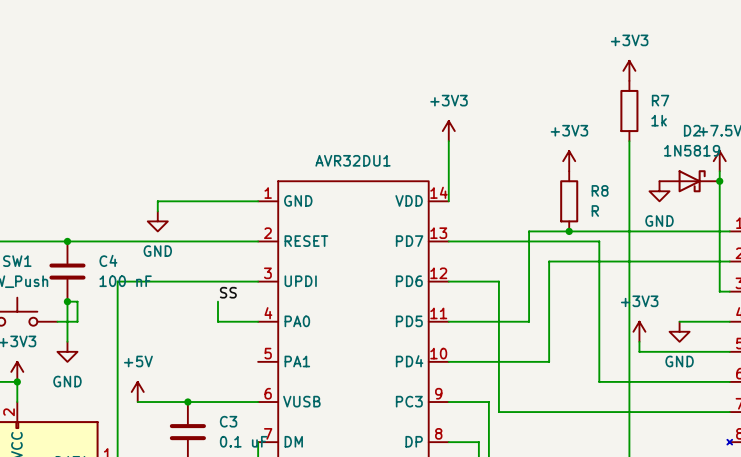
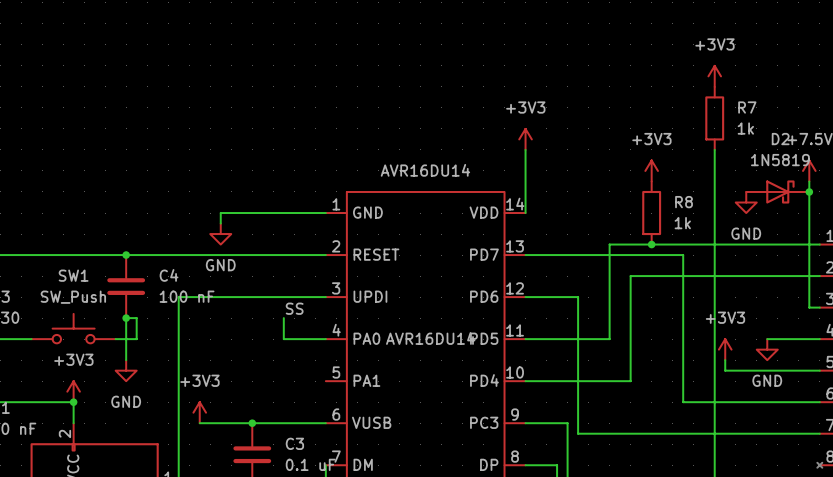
AVR32DU1 name: AVR32DU1 (352, 160) -> AVR16DU14 (425, 170)
R8 value: R (595, 210) -> 1k (682, 223)
AVR32DU1 value: none -> AVR16DU14 (430, 338)
power symbol: +5V (137, 391) -> +3V3 (199, 412)

